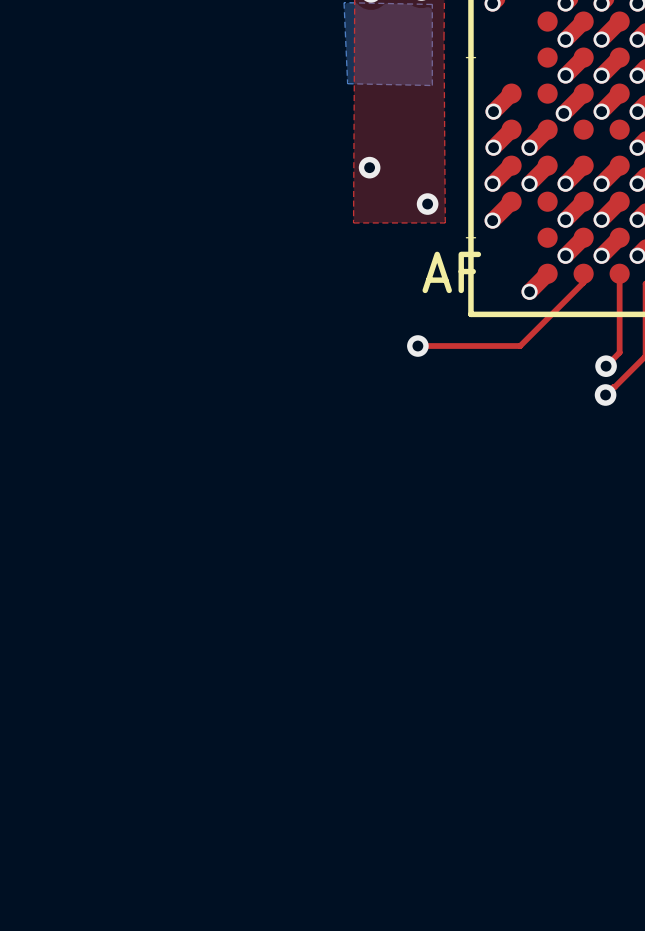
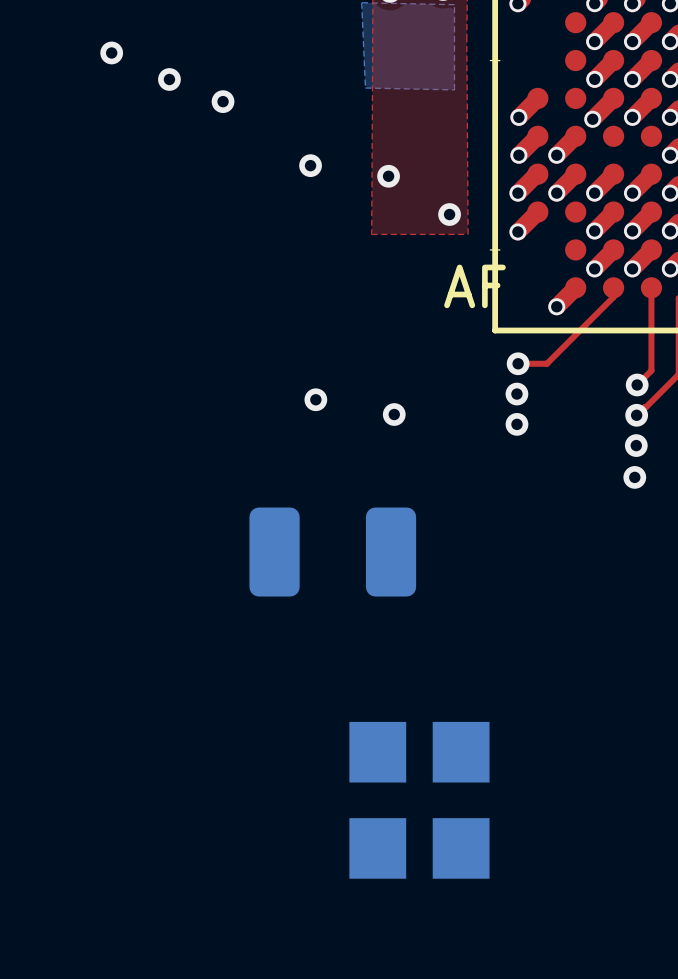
via: none -> (111, 52)
via: none -> (169, 79)
via: none -> (223, 101)
via: none -> (310, 165)
top track: (417, 346) (492, 346) -> none
via: (417, 346) -> none
via: none -> (518, 363)
via: none -> (516, 394)
via: none -> (315, 399)
via: none -> (394, 414)
via: none -> (516, 424)
via: none -> (636, 445)
via: none -> (634, 477)
part: none -> (332, 552)
part: none -> (419, 800)

